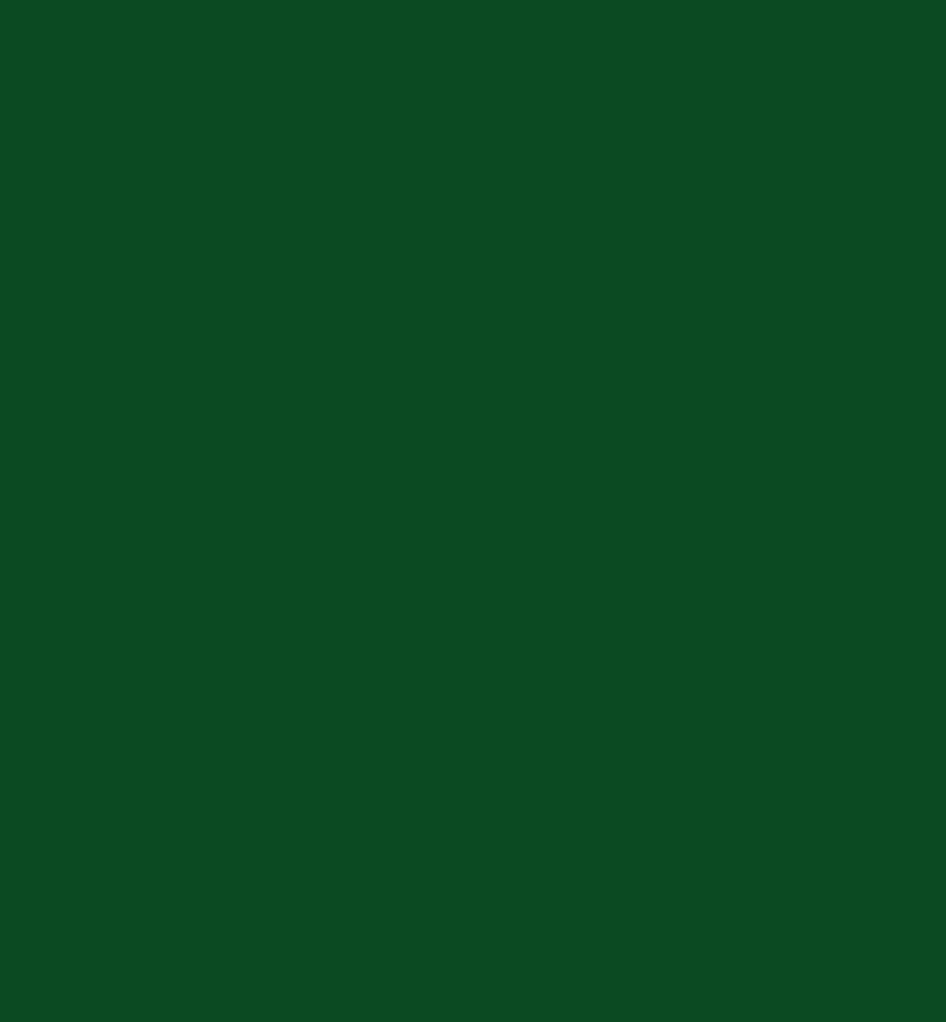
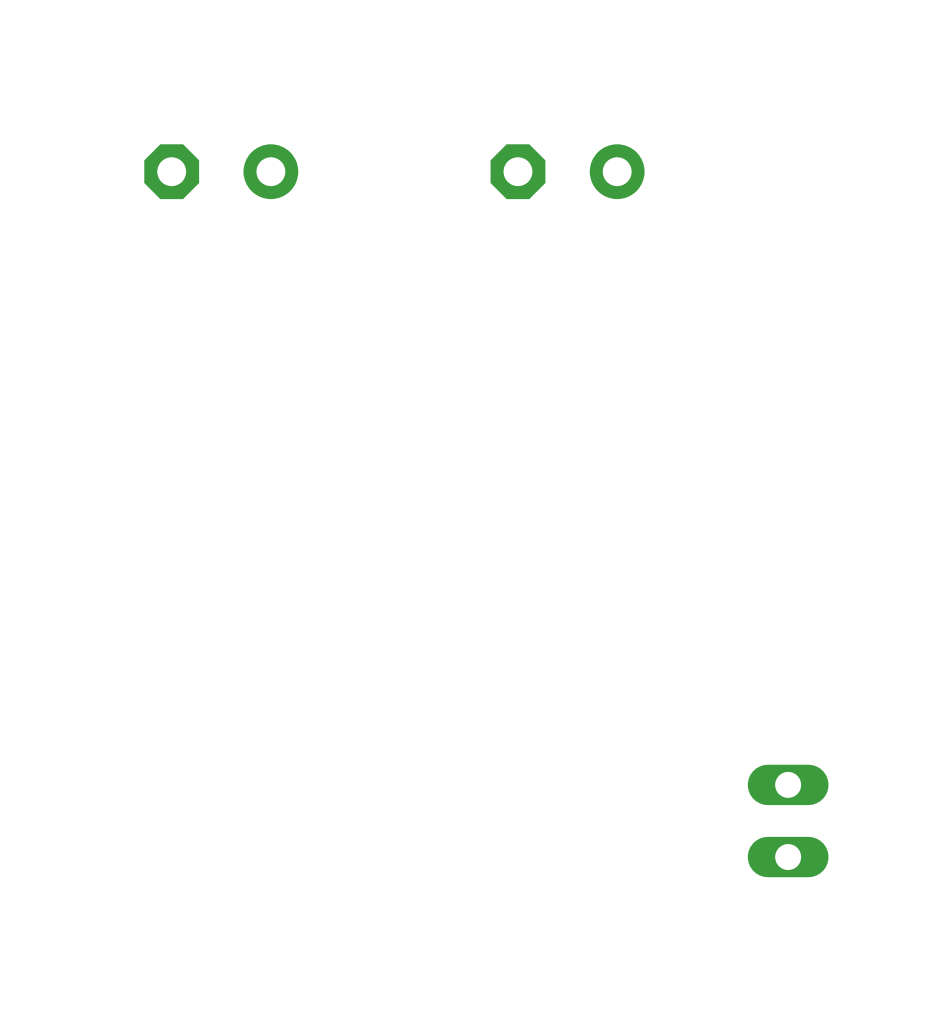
part: none -> (221, 171)
part: none -> (567, 171)
part: none -> (788, 820)

